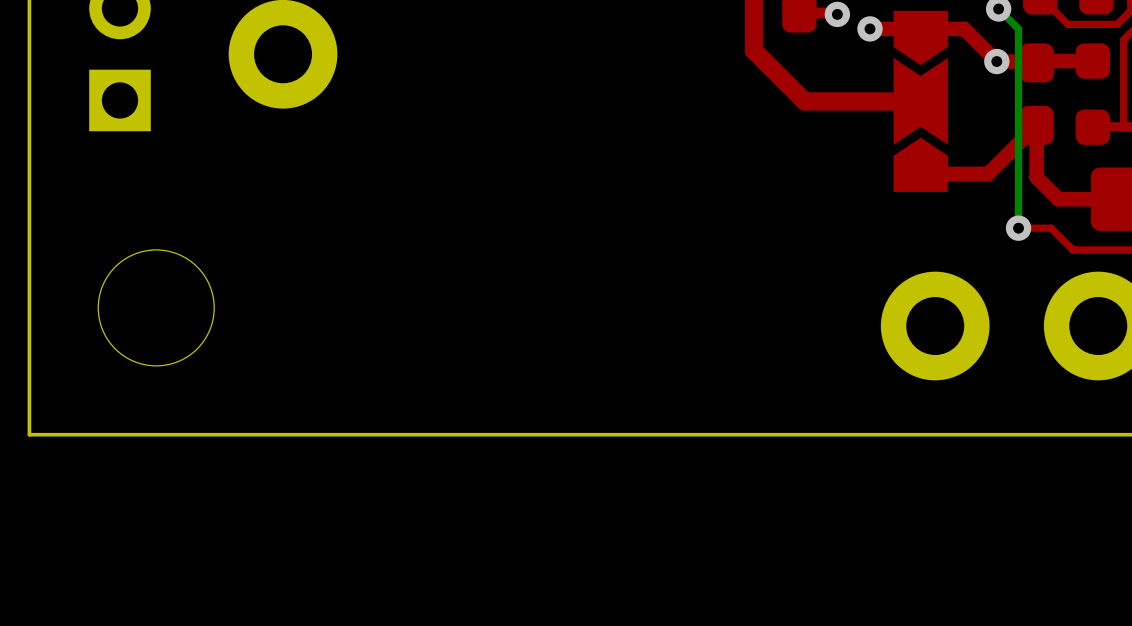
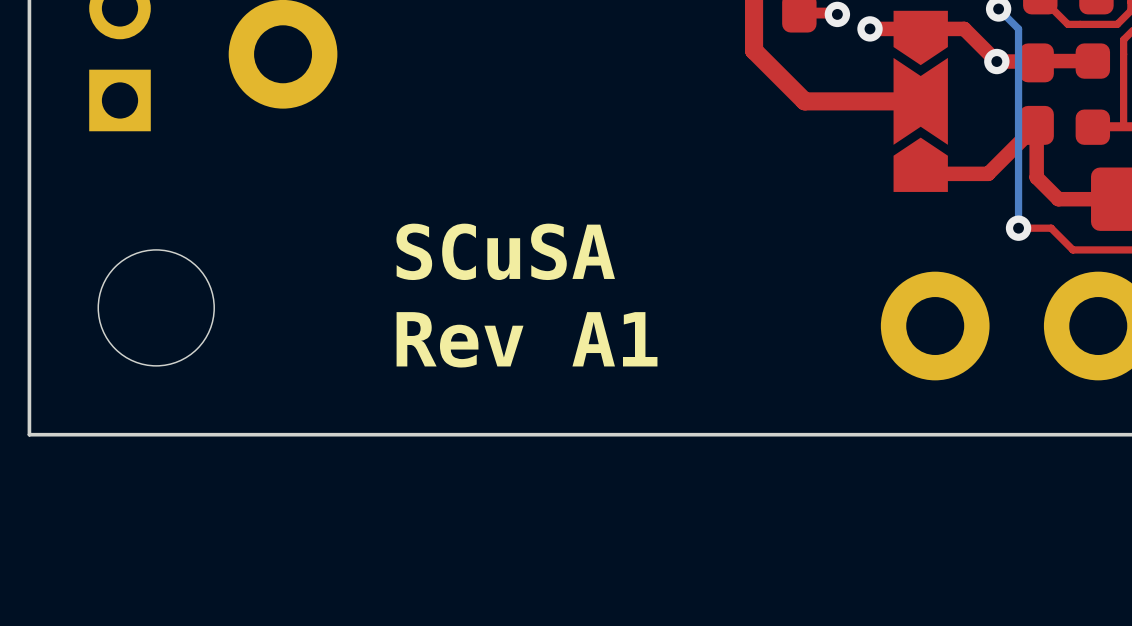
text: none -> SCuSA (505, 251)
text: none -> Rev A1 (527, 339)

